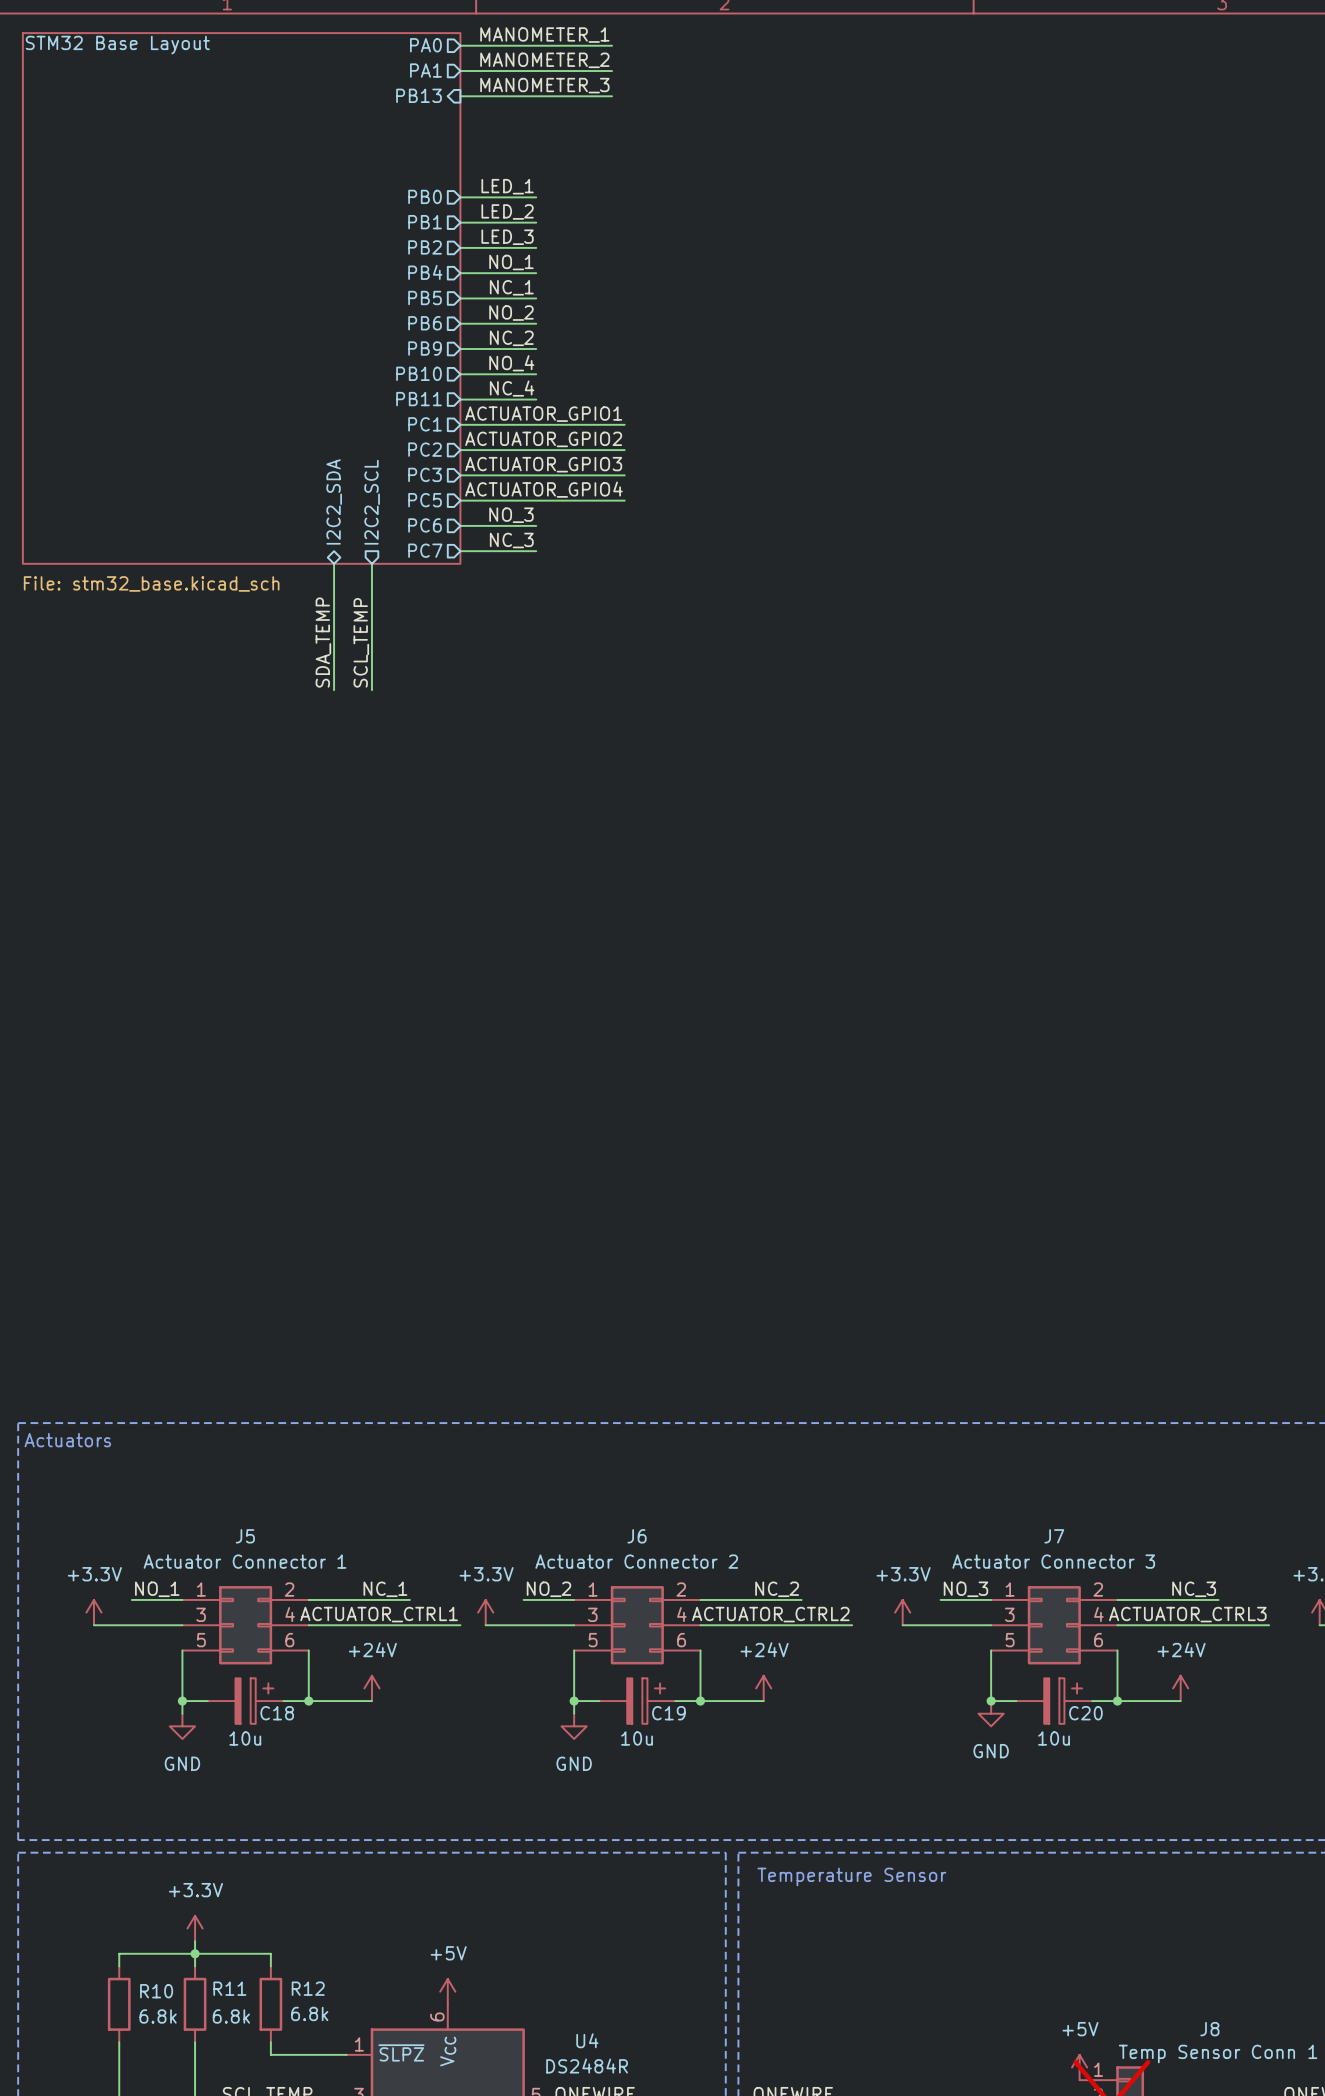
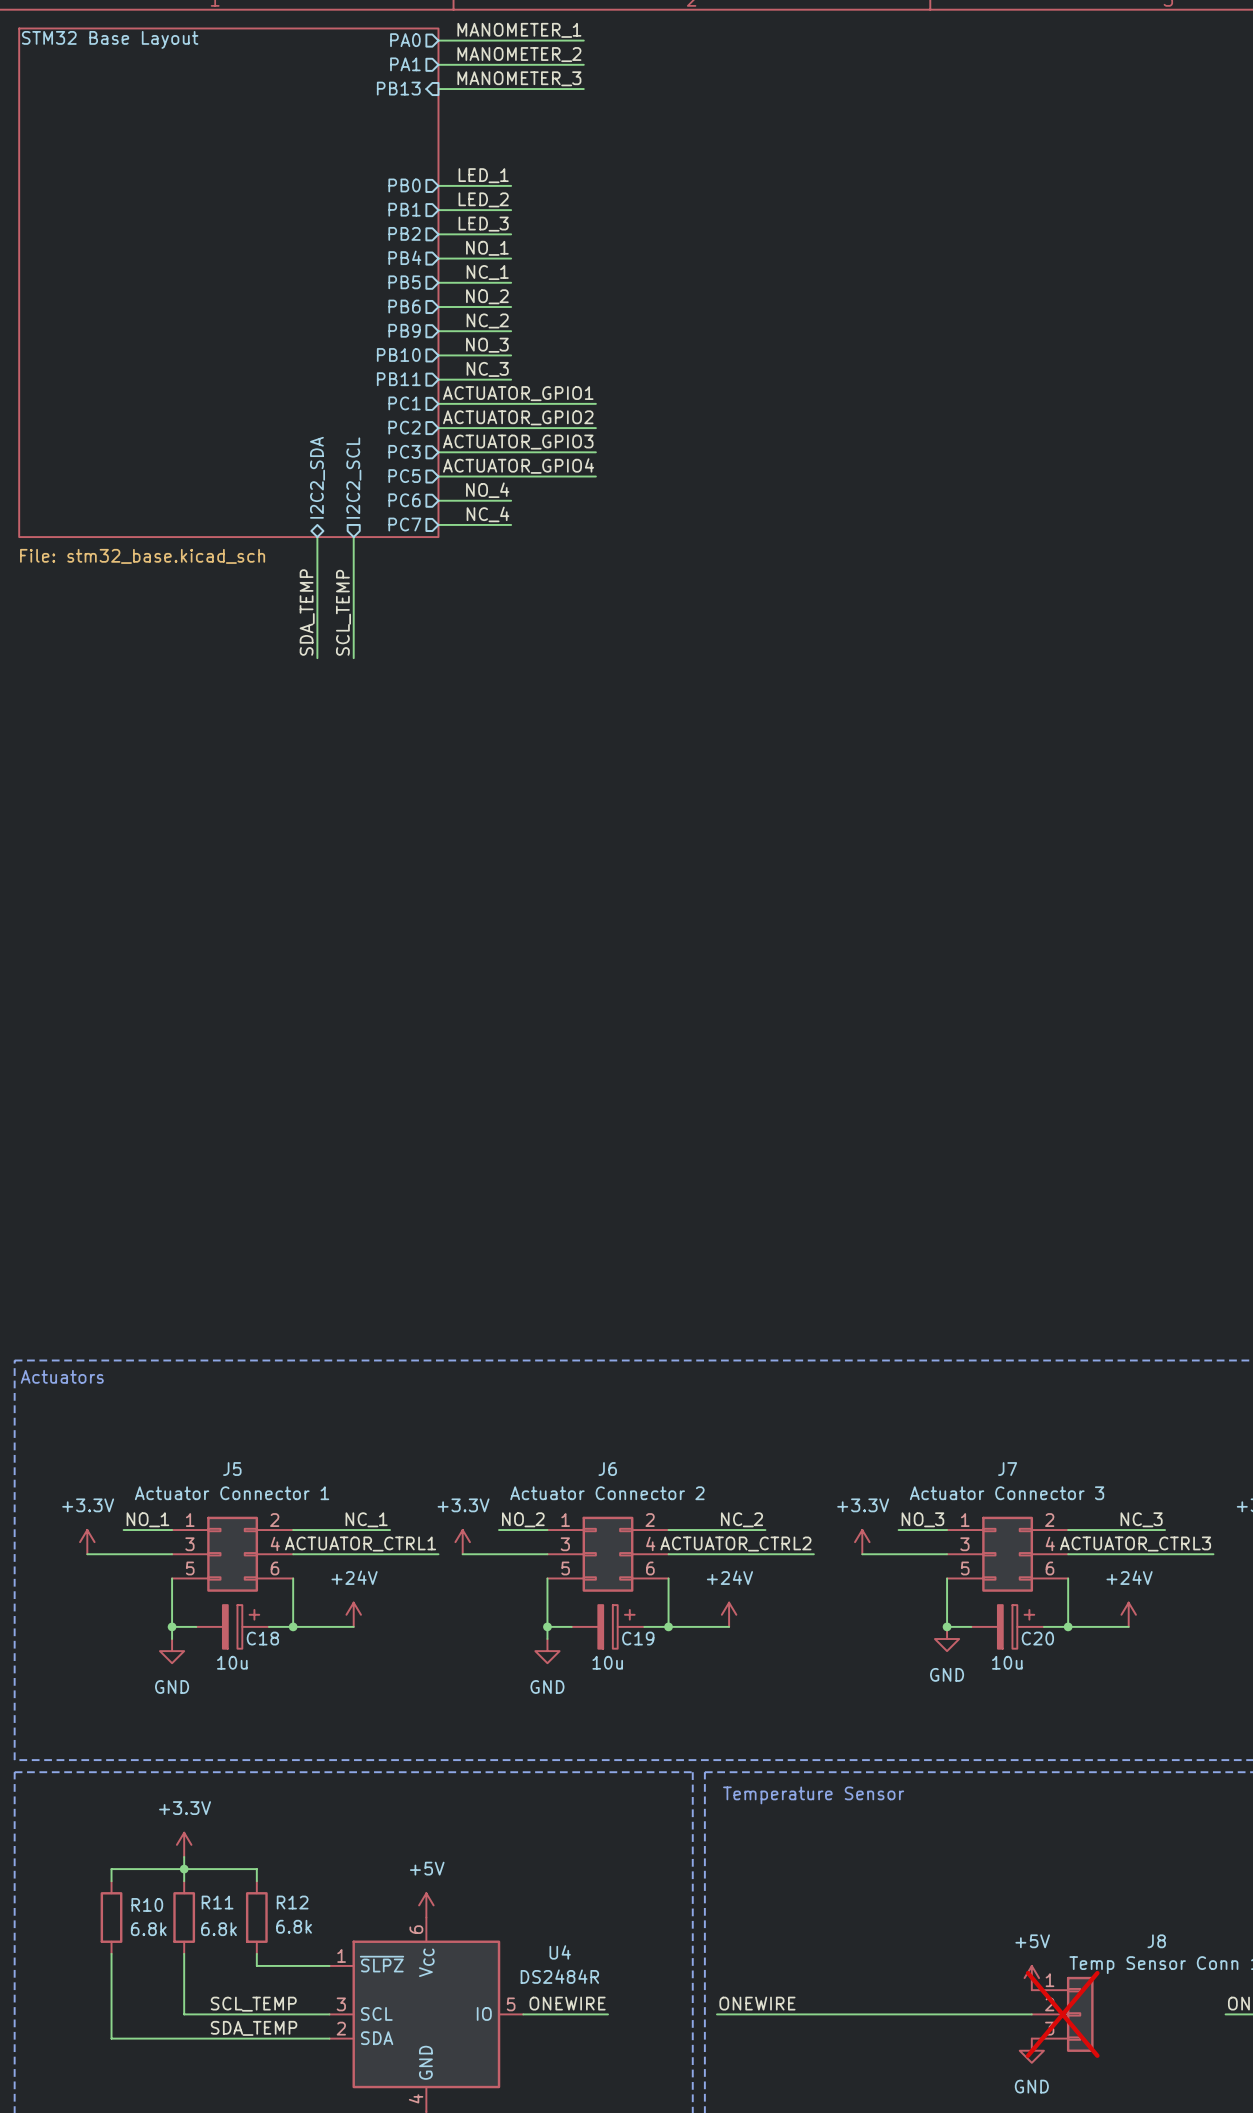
label: NO_4 (511, 363) -> NO_3 (487, 345)
label: NC_4 (512, 388) -> NC_3 (487, 369)
label: NO_3 (511, 515) -> NO_4 (487, 490)
label: NC_3 (511, 540) -> NC_4 (487, 514)

